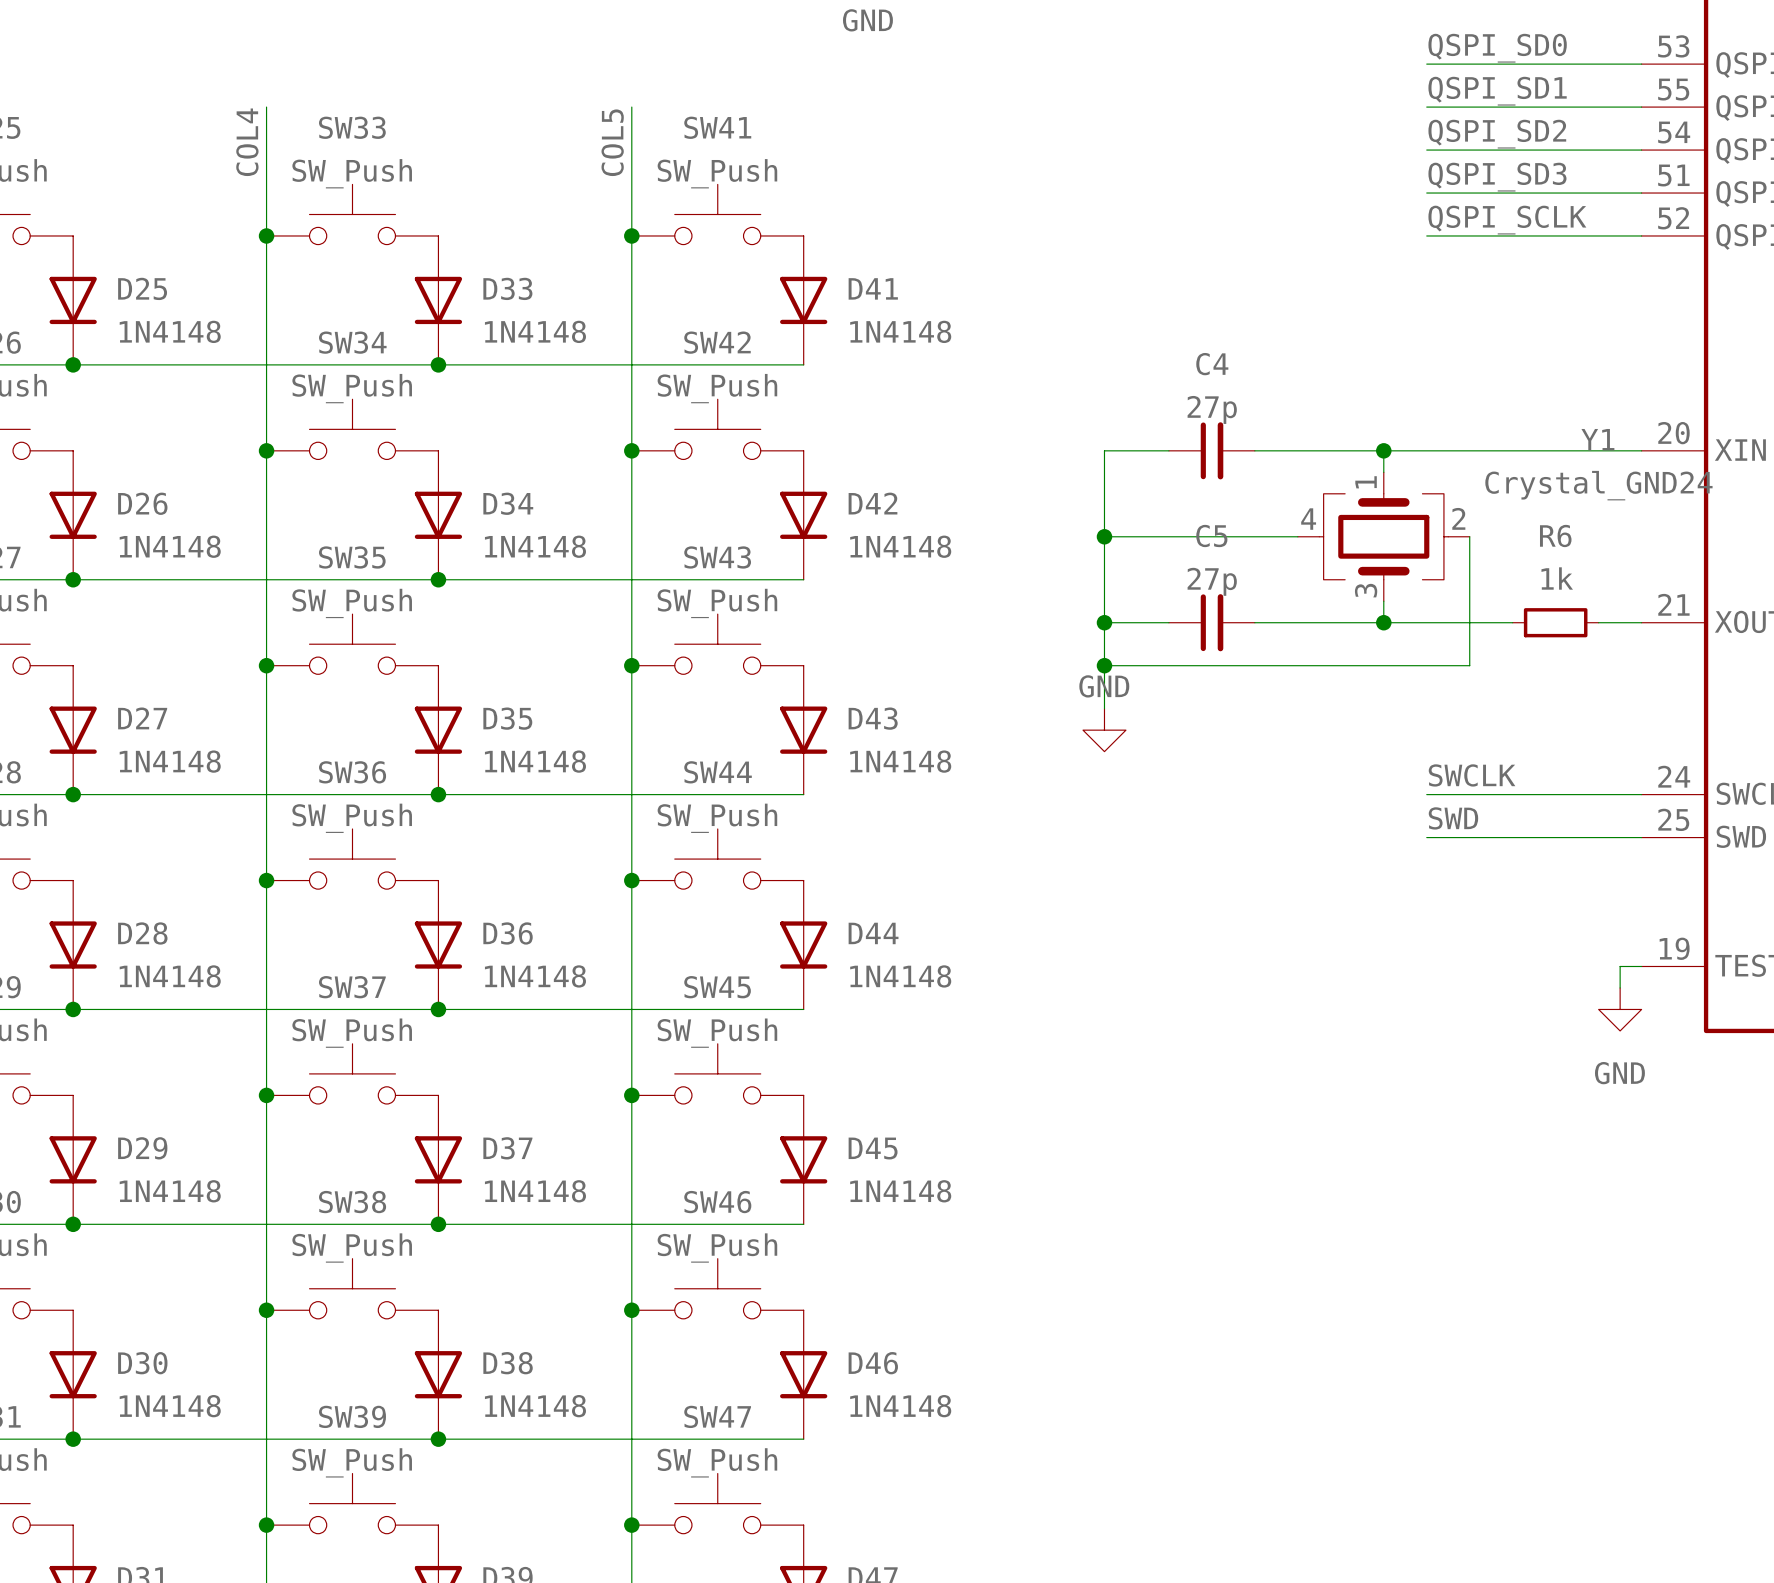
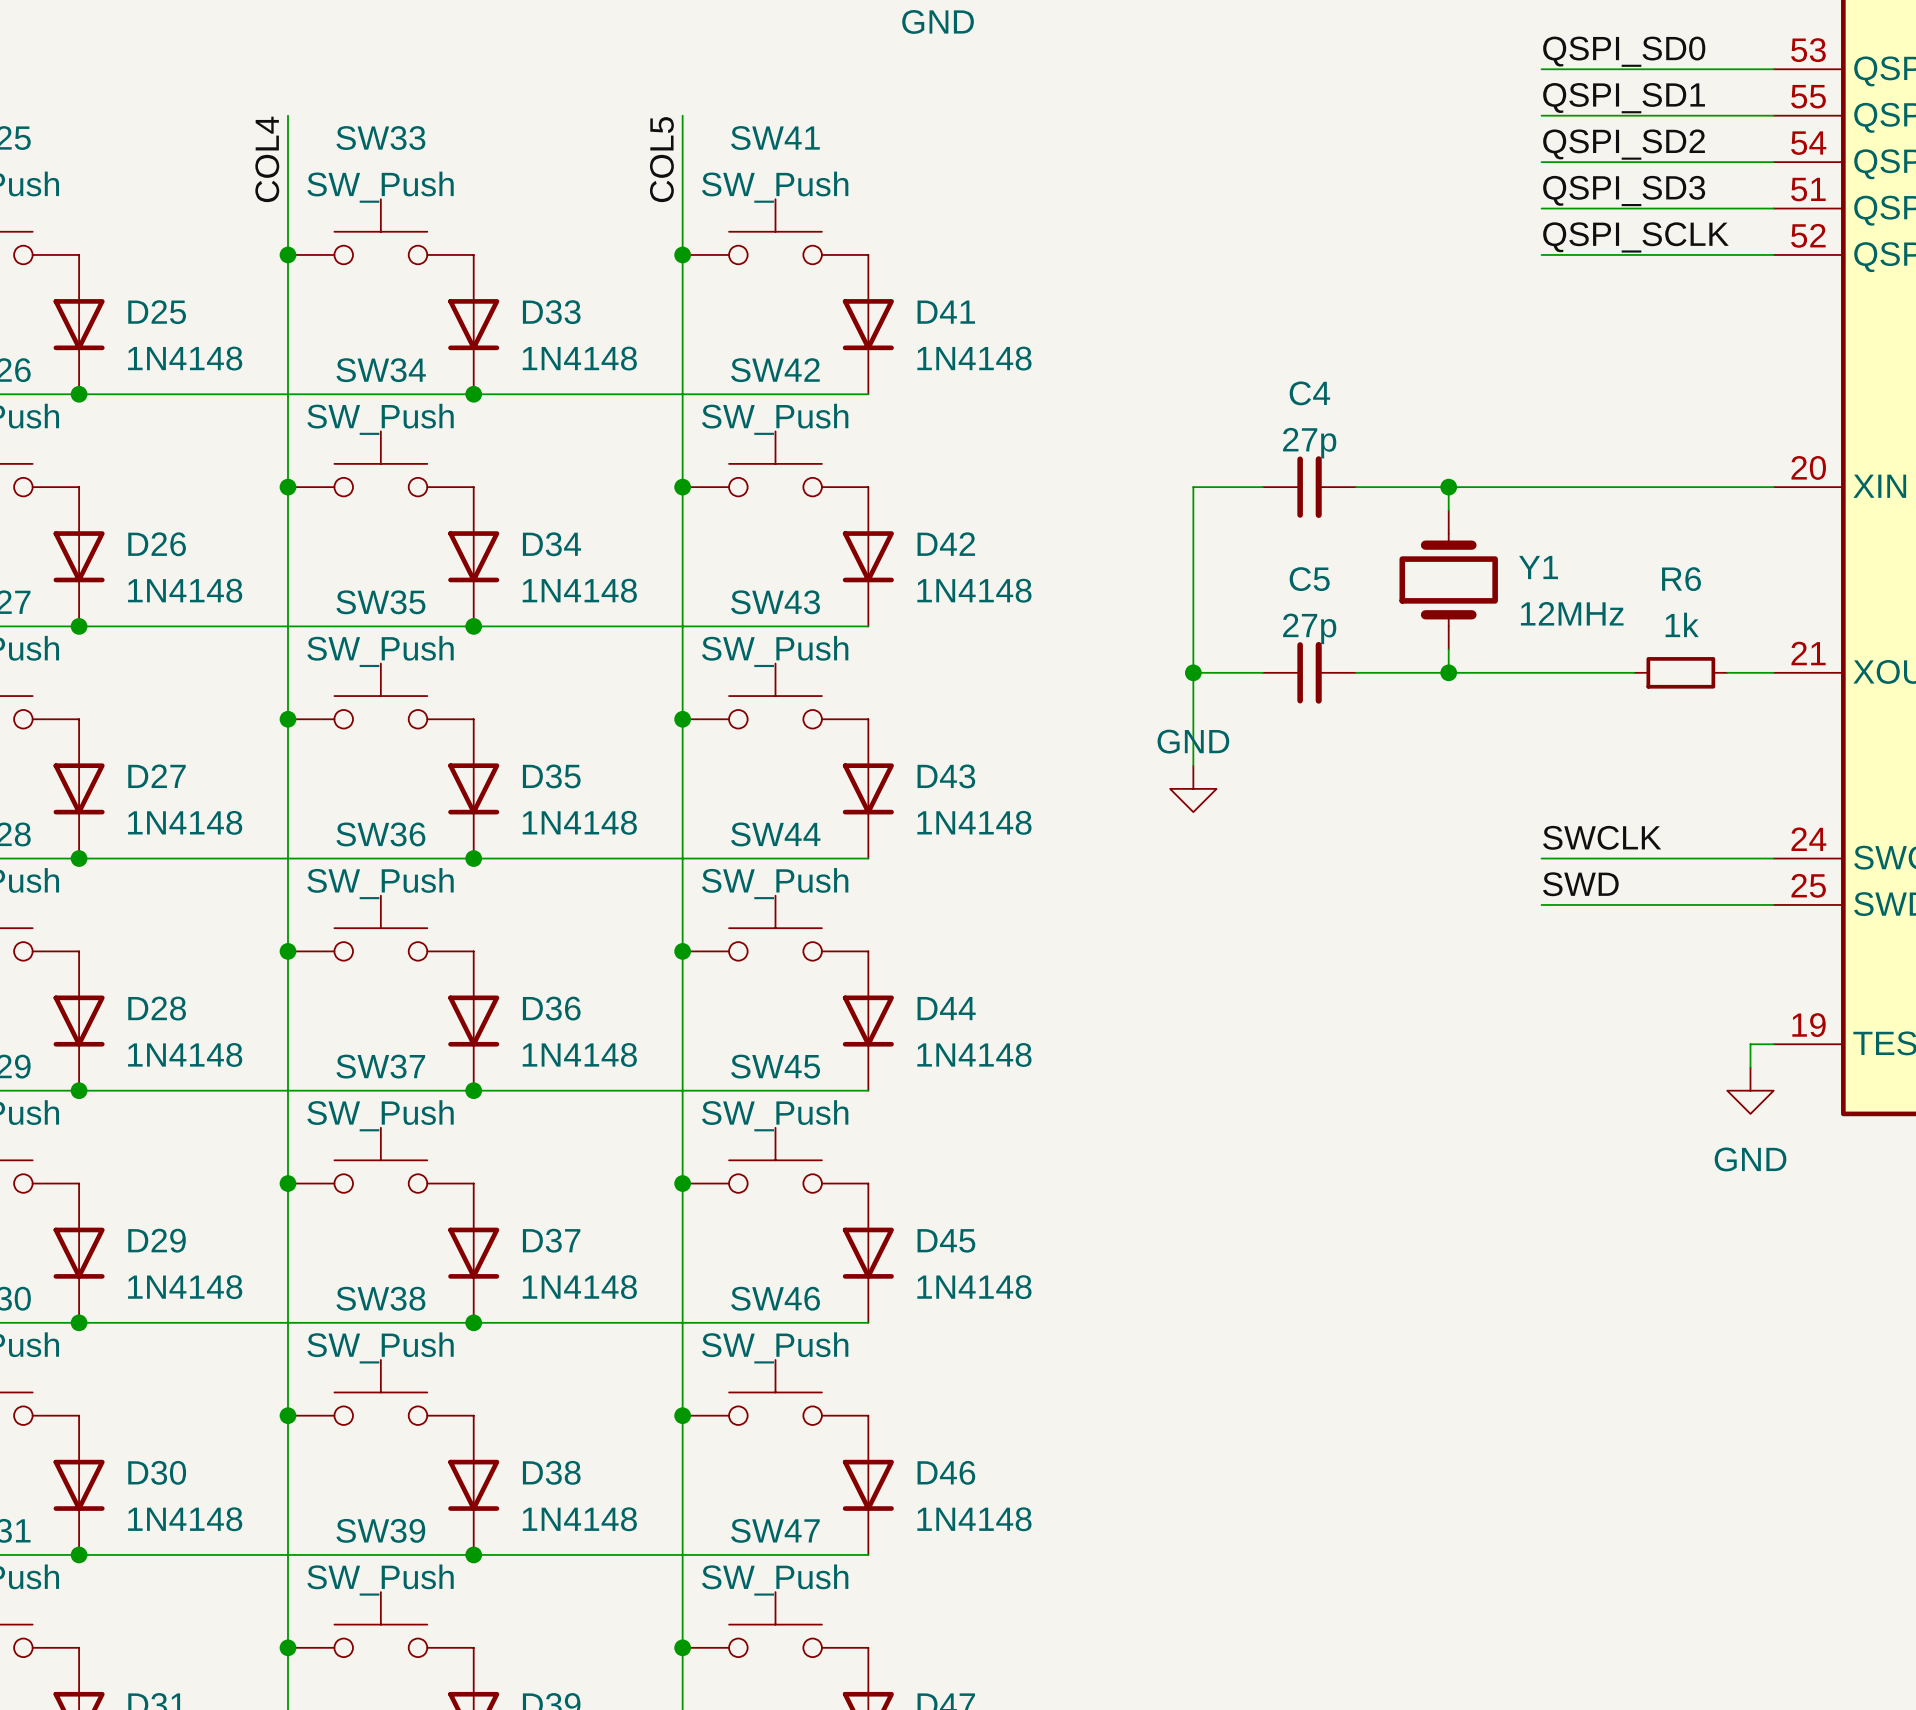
Y1 name position: Y1 (1597, 439) -> Y1 (1538, 567)
wire: (1383, 450) (1383, 472) -> (1448, 487) (1448, 510)
junction position: (1383, 450) -> (1448, 487)
Y1 symbol: [1297, 472, 1470, 602] -> [1399, 510, 1498, 650]
Y1 value: Crystal_GND24 (1598, 485) -> 12MHz (1572, 613)
wire: (1104, 536) (1297, 536) -> none
junction: (1104, 536) -> none
wire: (1469, 536) (1469, 665) (1104, 665) -> none
wire: (1383, 601) (1383, 622) -> (1448, 649) (1448, 672)
junction position: (1383, 622) -> (1448, 672)
junction: (1104, 665) -> none

